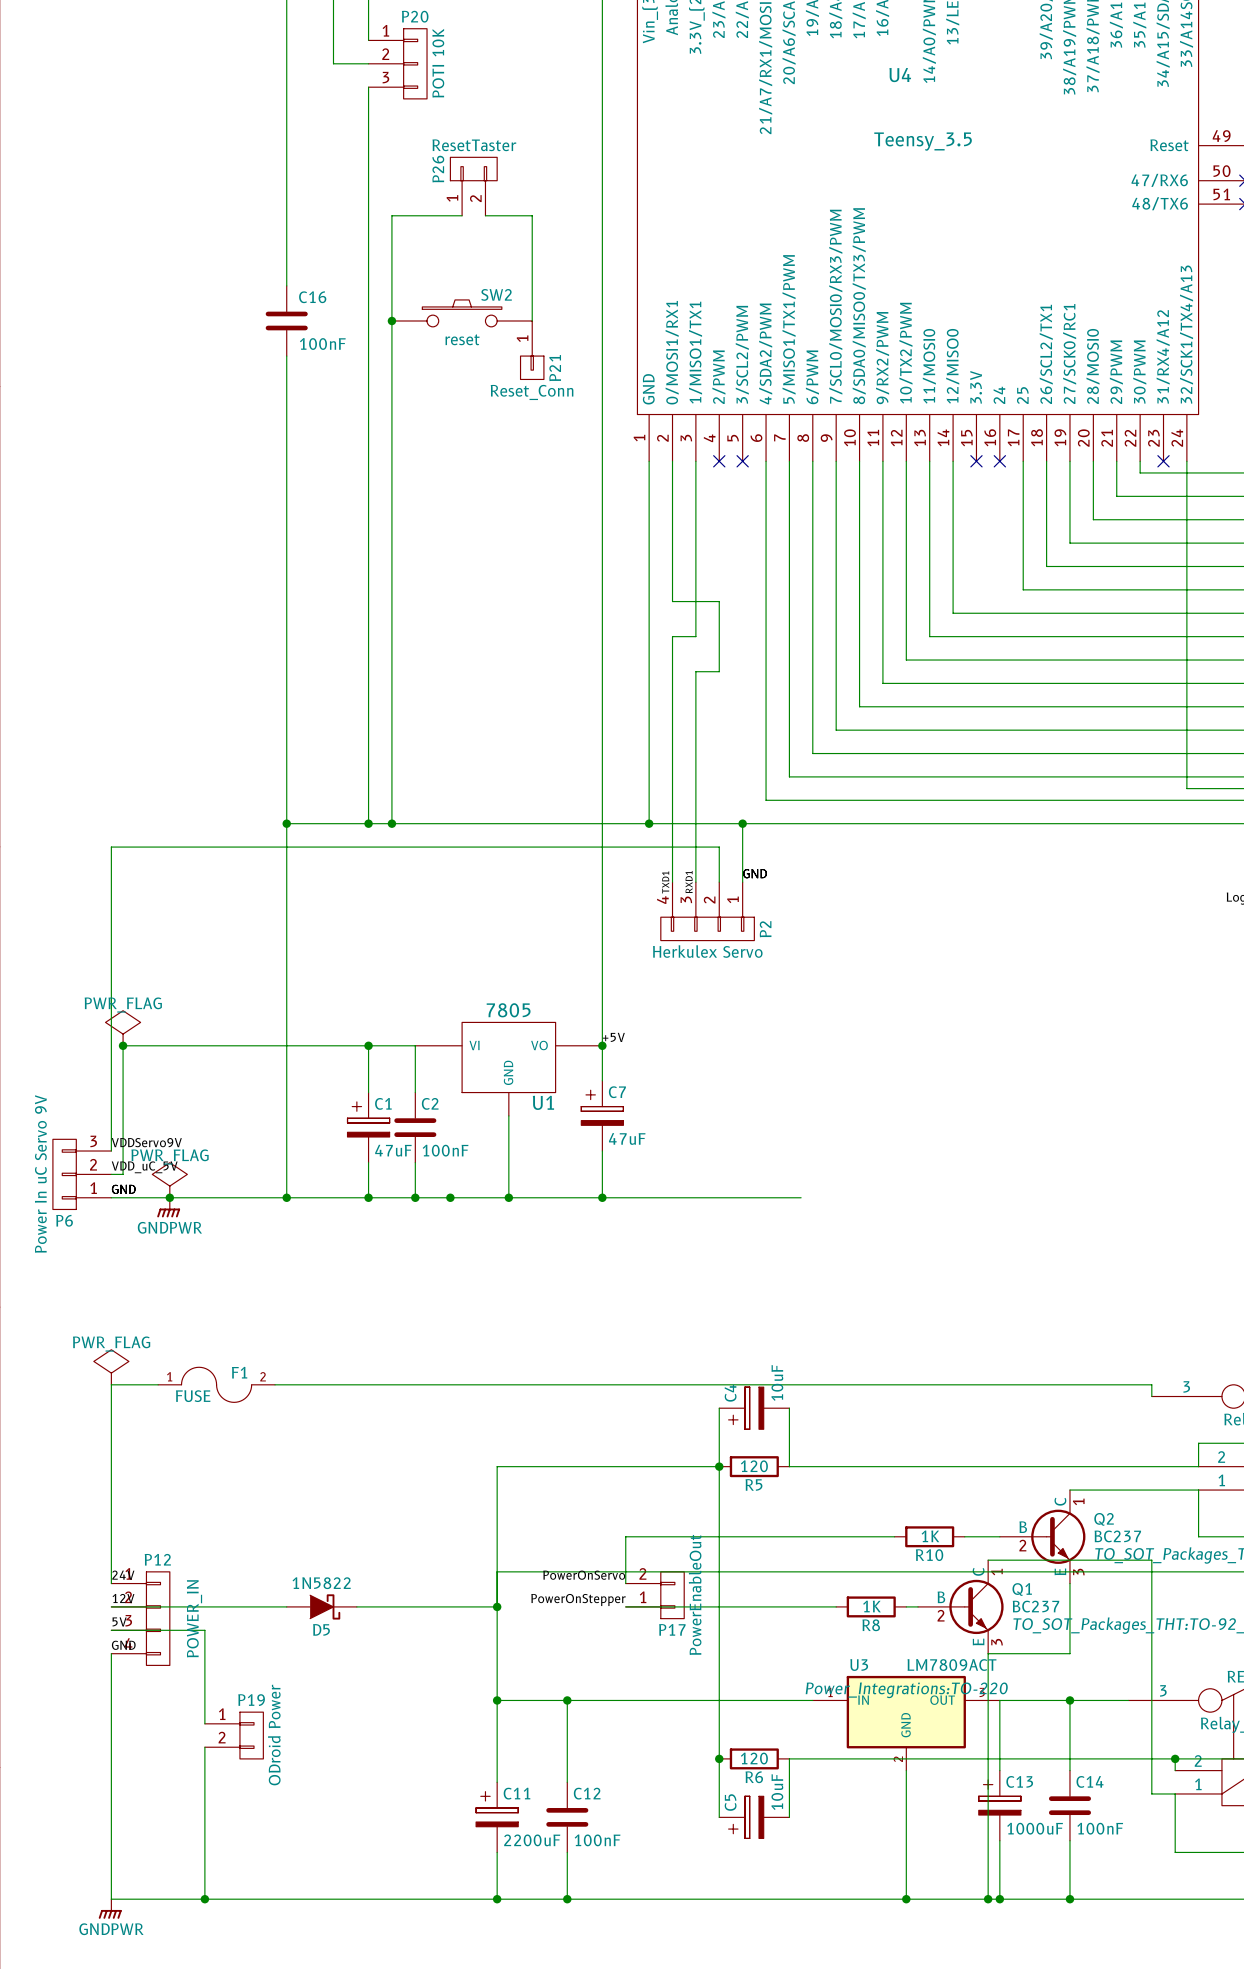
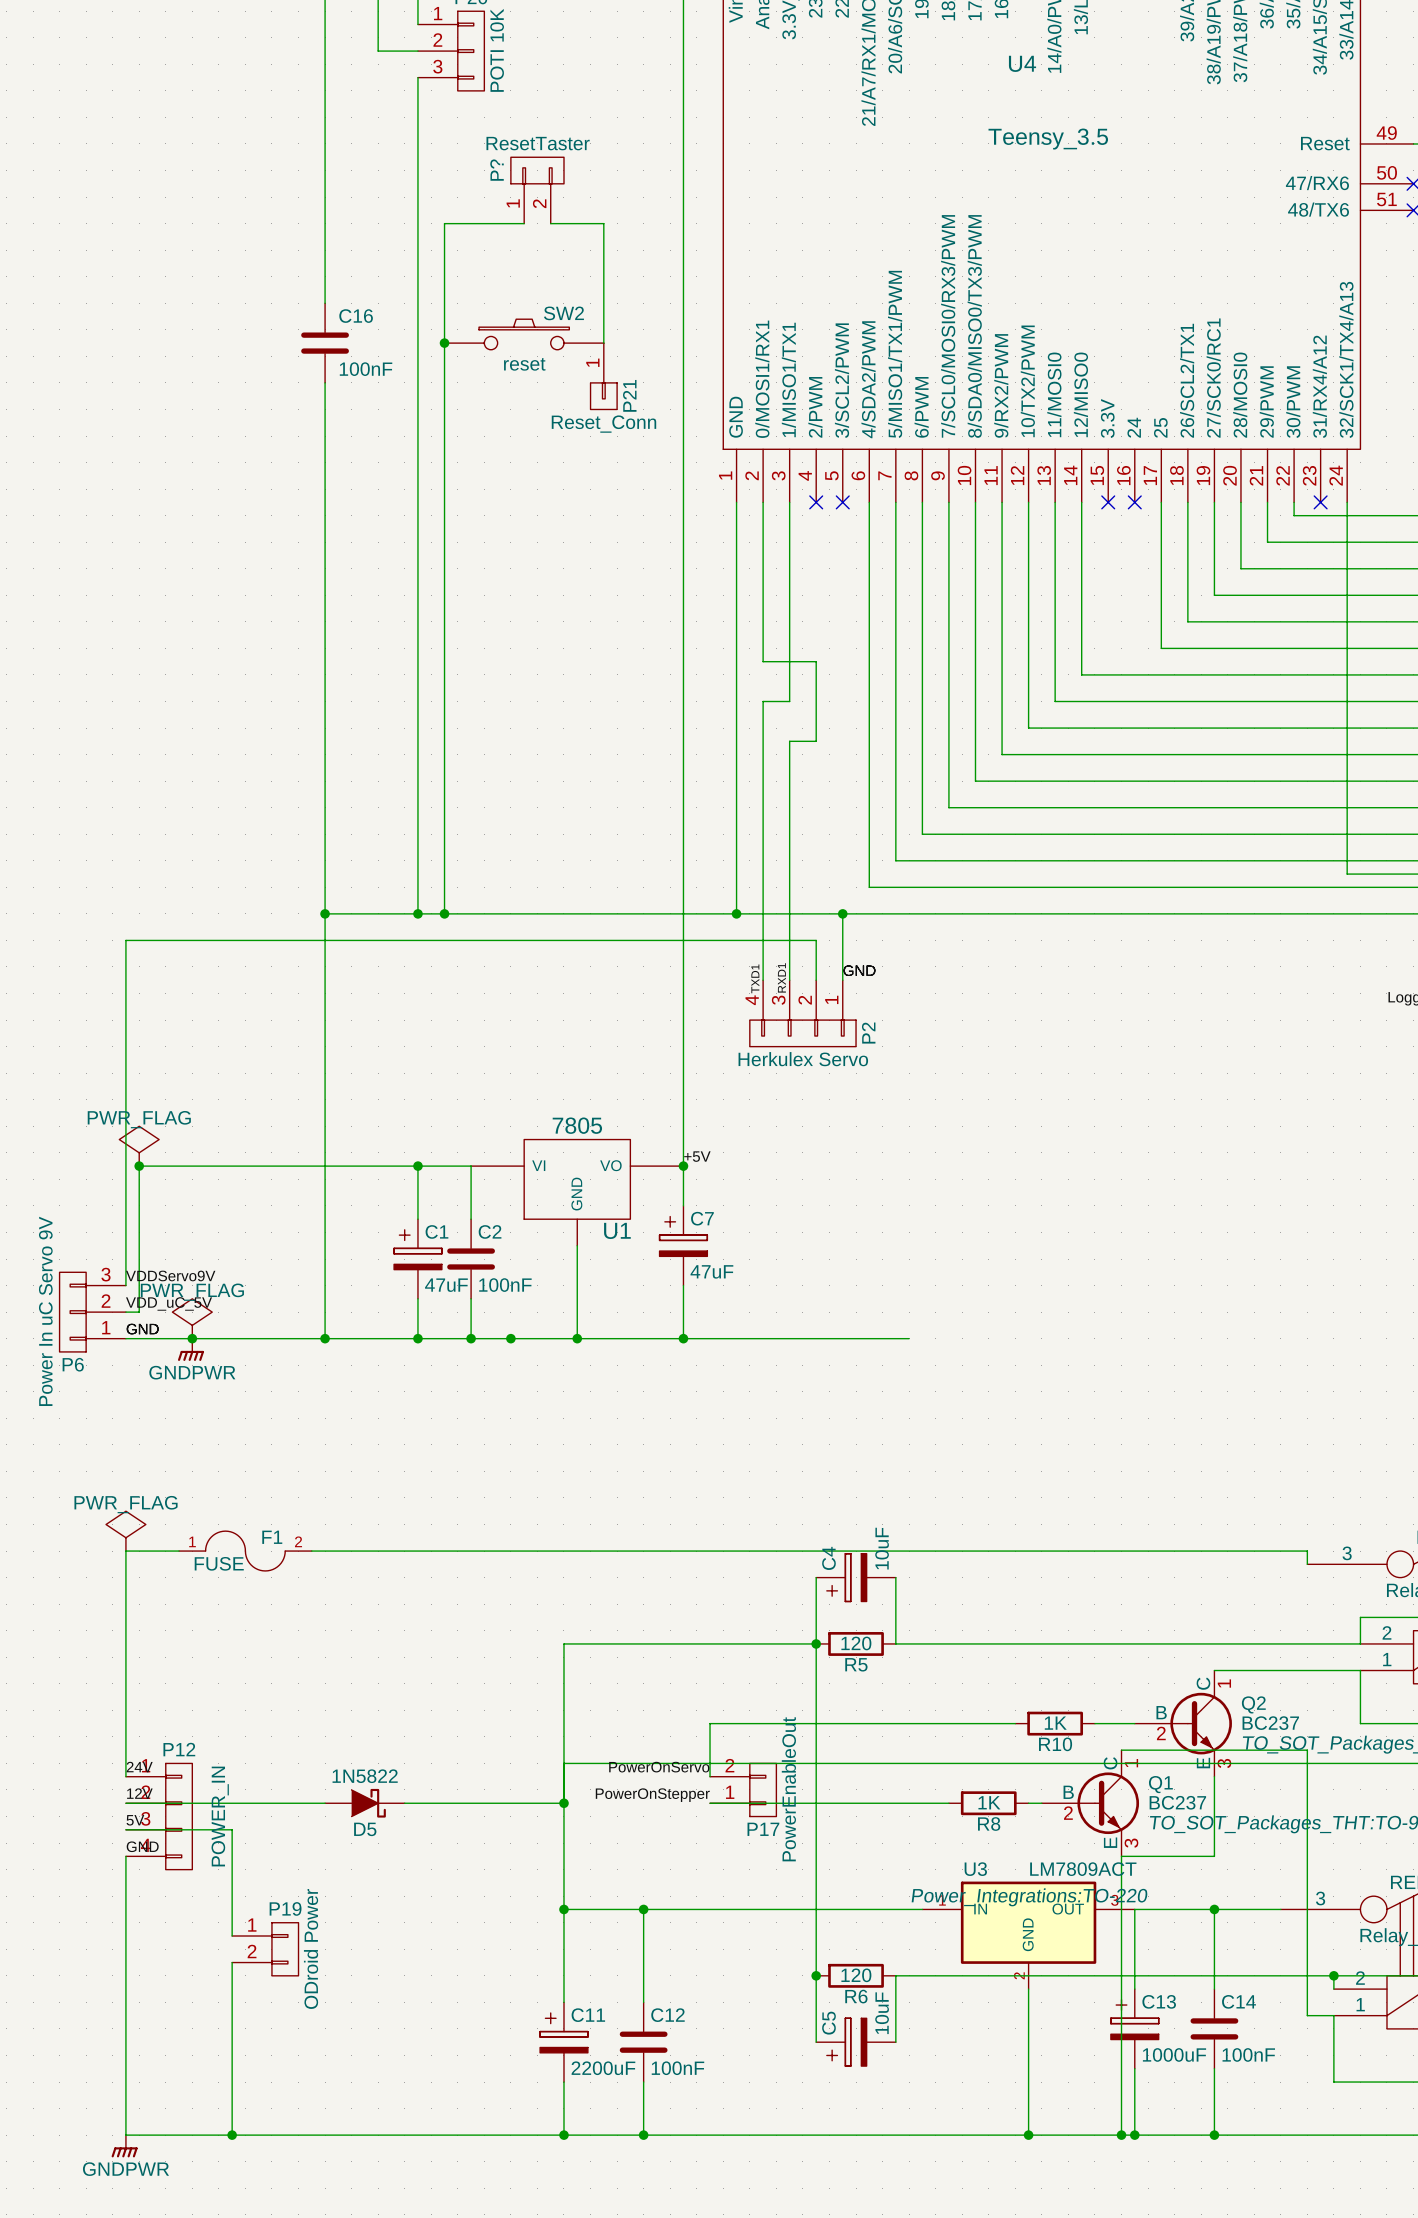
P26 name: P26 (438, 169) -> P? (497, 170)

